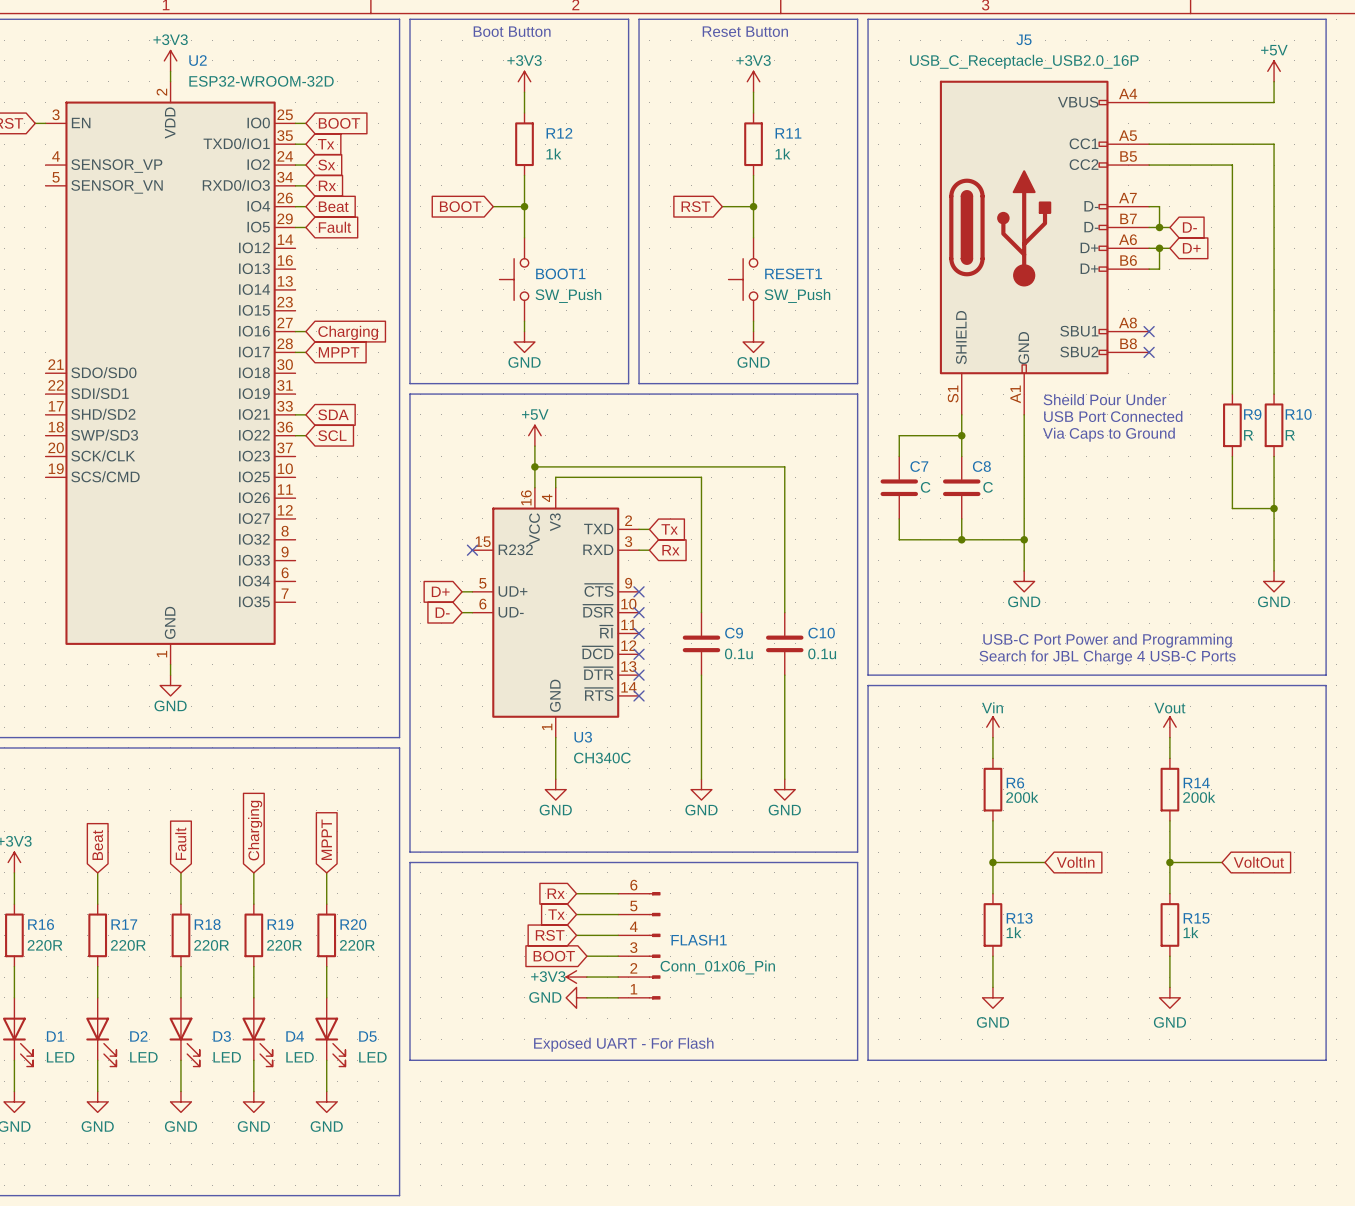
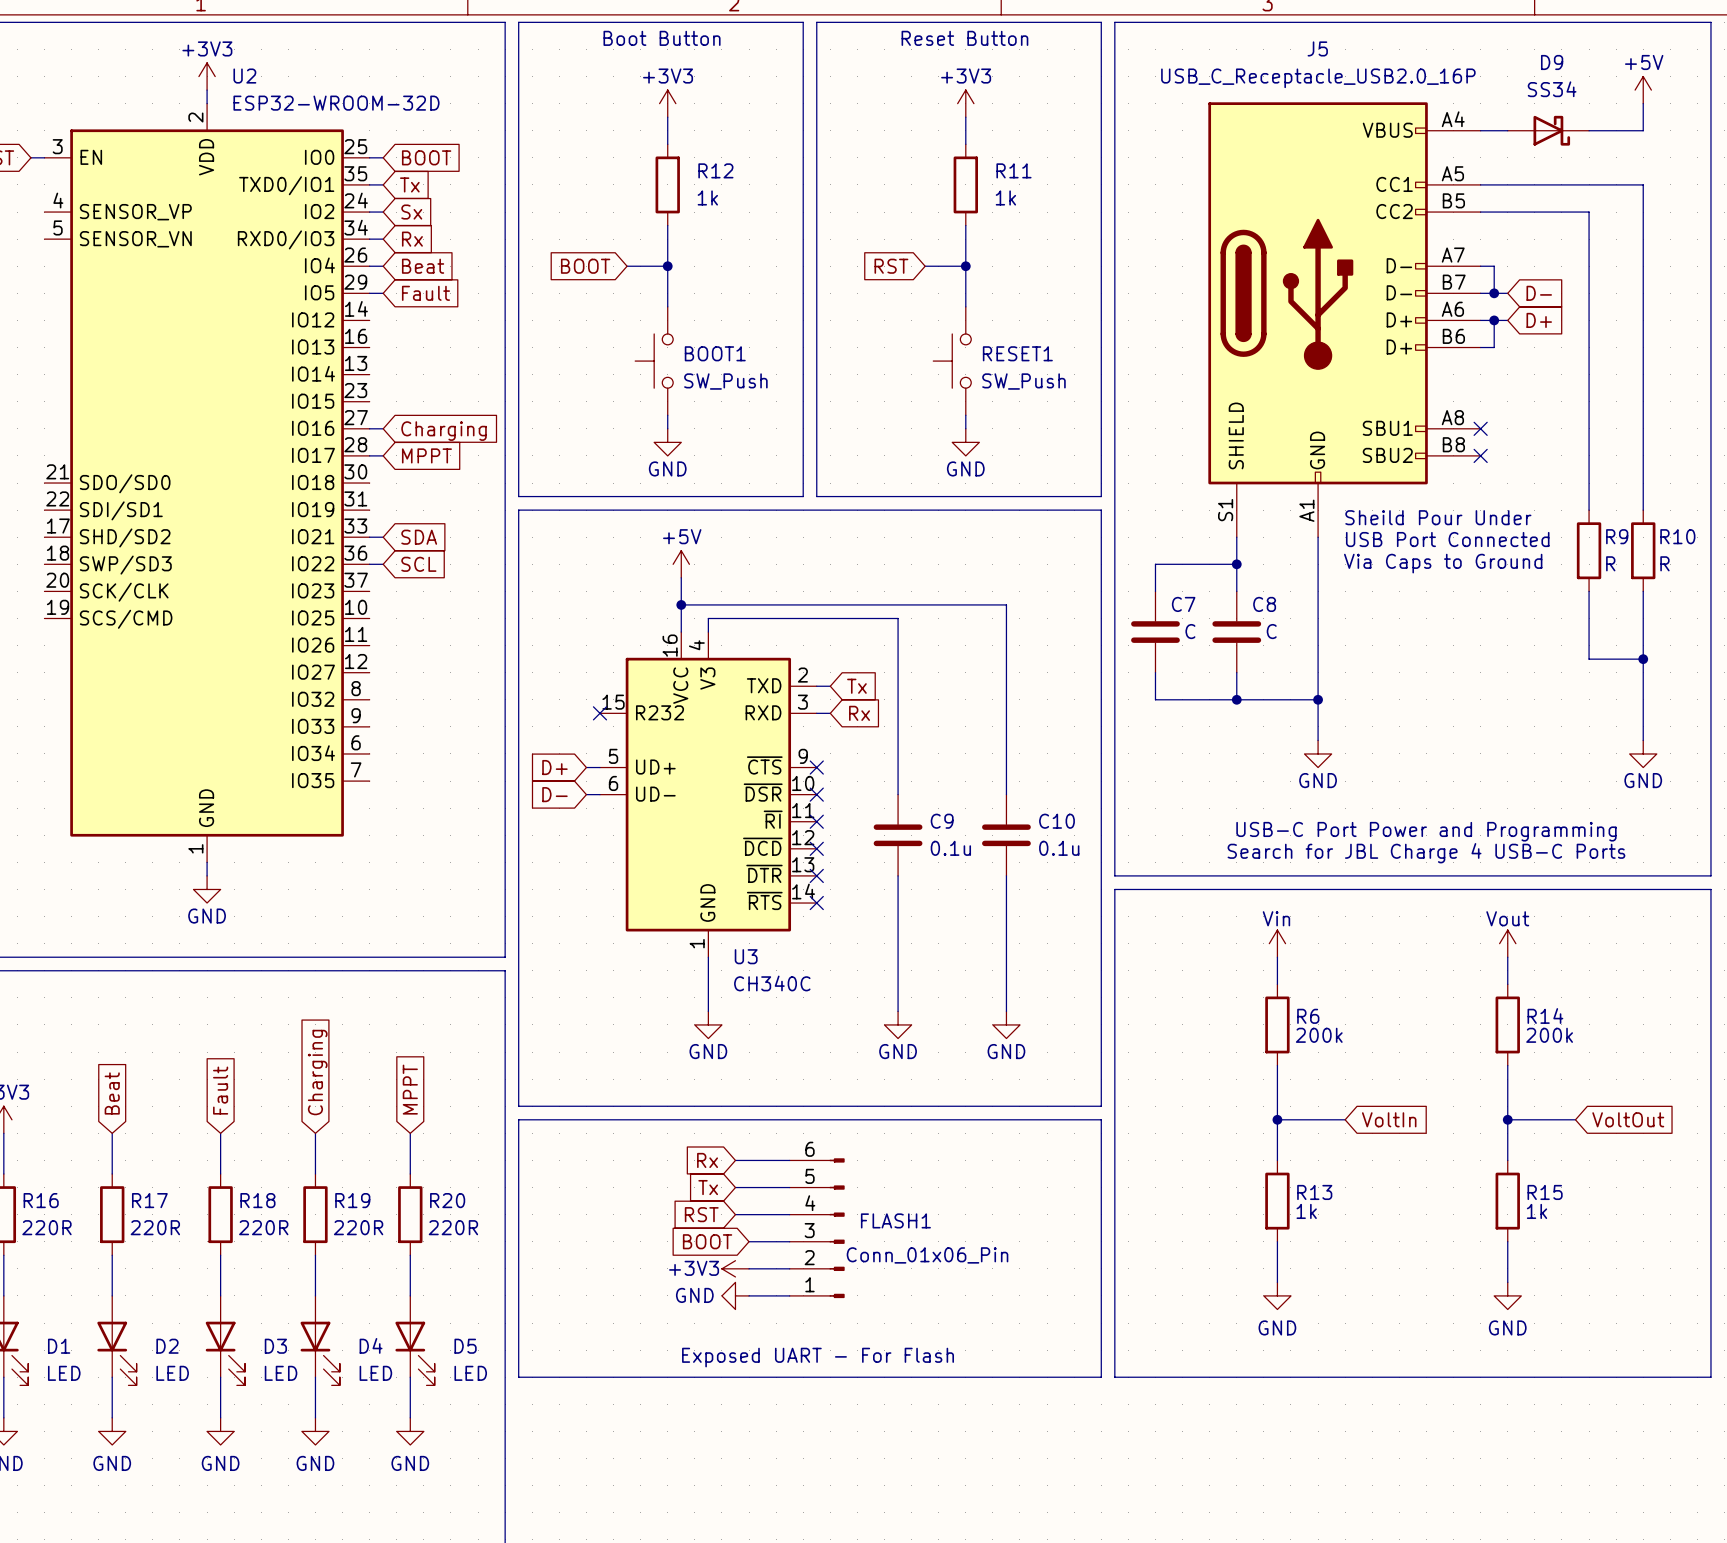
D9: none -> SS34 (1548, 130)

